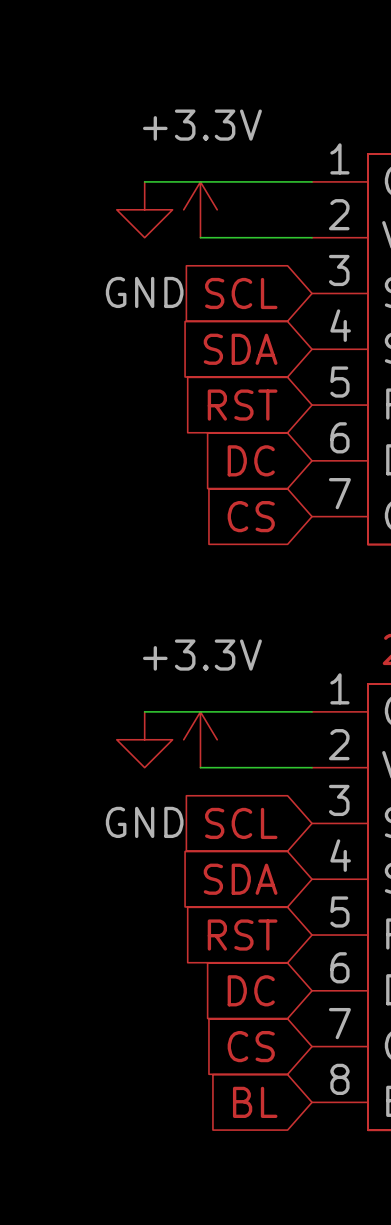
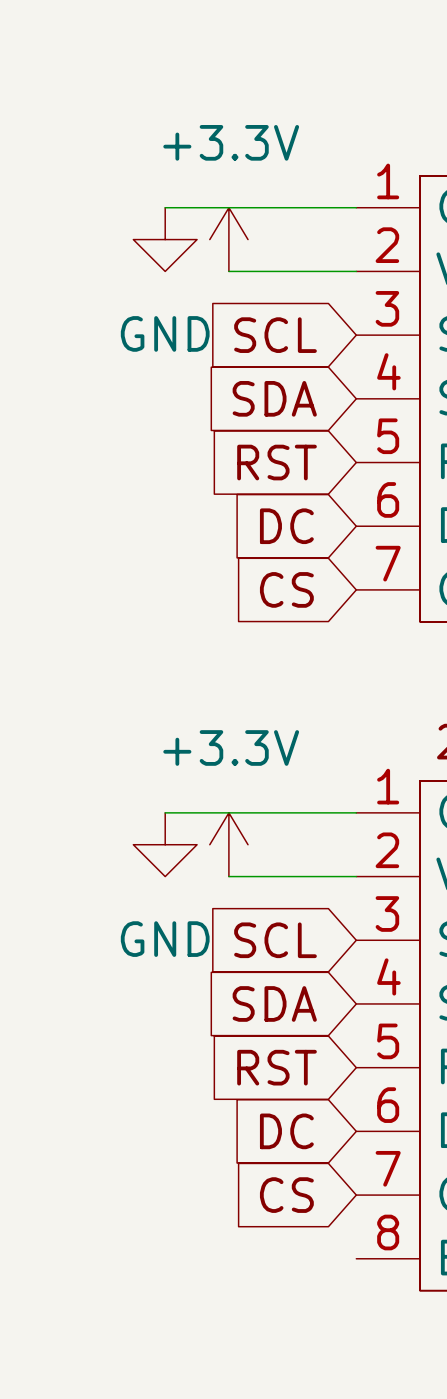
global label: BL (255, 1102) -> none

